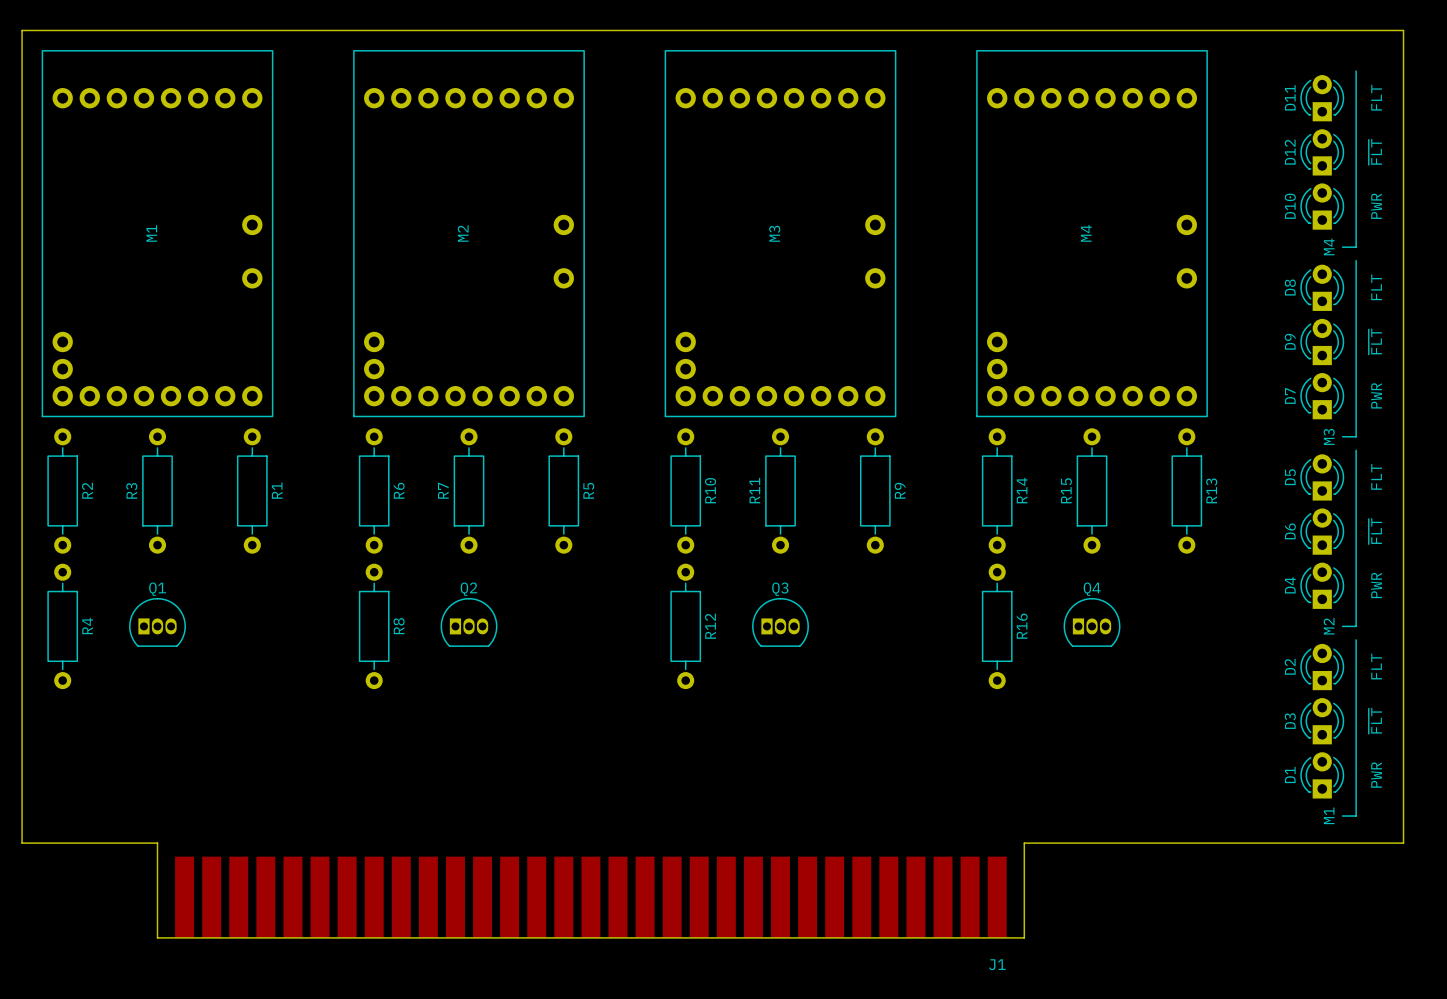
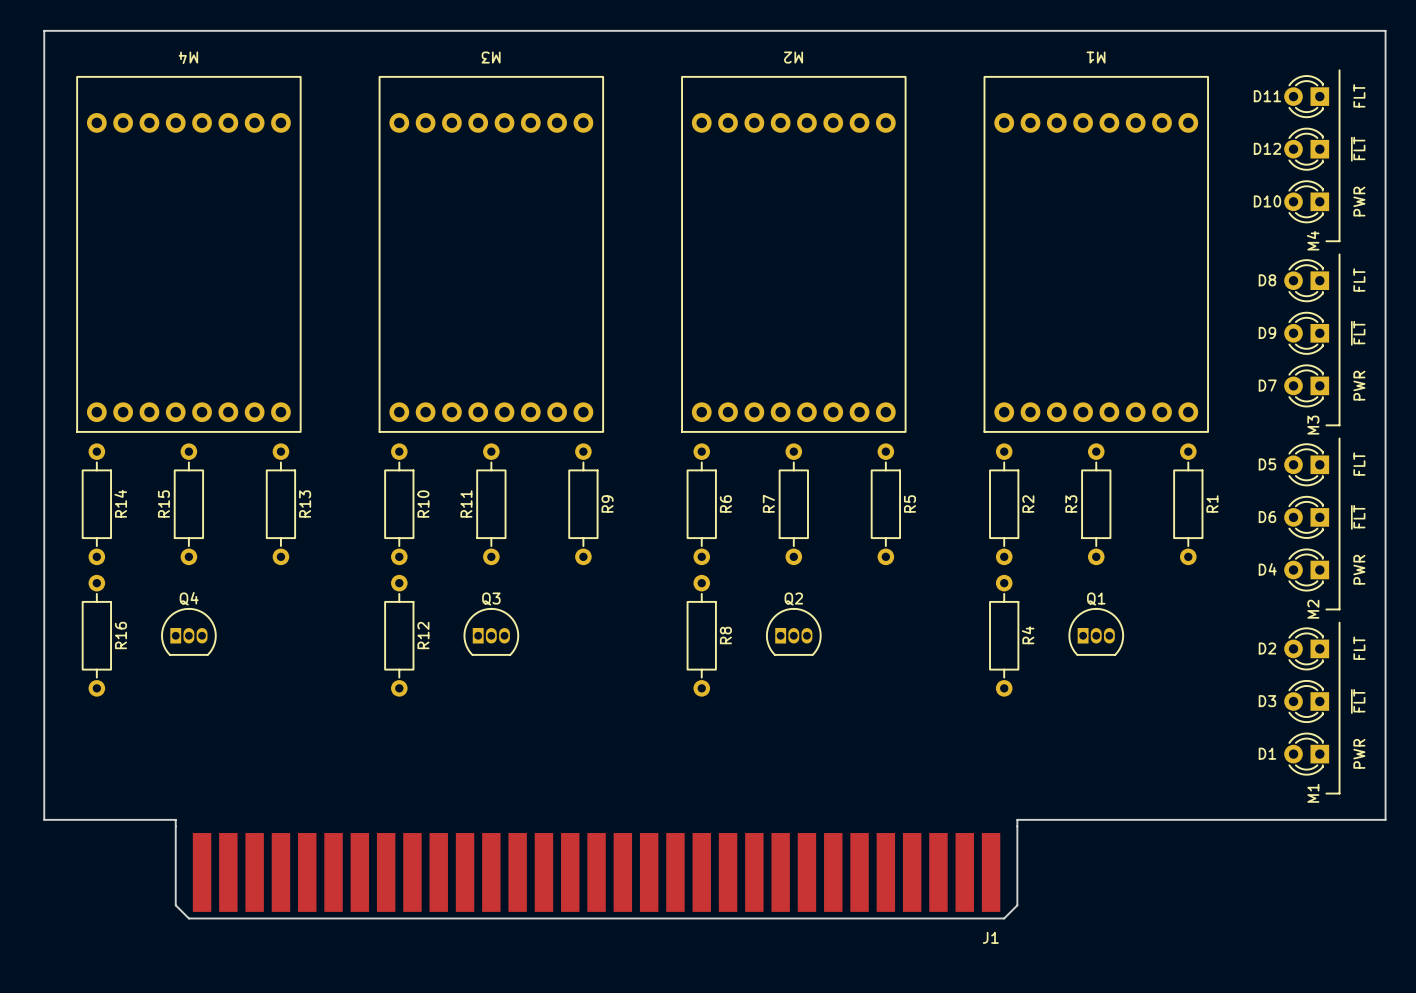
M1 footprint: [41, 50, 274, 418] -> [983, 76, 1209, 433]
M2 footprint: [353, 50, 585, 418] -> [681, 76, 907, 433]
M3 footprint: [664, 50, 897, 418] -> [379, 76, 604, 433]
M4 footprint: [976, 50, 1208, 418] -> [76, 76, 302, 433]
D11 rotation: 0° (1322, 98) -> 90° counterclockwise (1306, 96)
D12 rotation: 0° (1322, 152) -> 90° counterclockwise (1306, 149)
D10 rotation: 0° (1322, 206) -> 90° counterclockwise (1306, 201)
M1 name position: M1 (151, 233) -> M1 (1096, 57)
M2 name position: M2 (463, 233) -> M2 (793, 57)
M3 name position: M3 (774, 233) -> M3 (491, 57)
M4 name position: M4 (1086, 233) -> M4 (188, 57)
D8 rotation: 0° (1322, 287) -> 90° counterclockwise (1306, 280)
D9 rotation: 0° (1322, 341) -> 90° counterclockwise (1306, 333)
D7 rotation: 0° (1322, 396) -> 90° counterclockwise (1306, 385)
D5 rotation: 0° (1322, 477) -> 90° counterclockwise (1306, 464)
R2 position: (62, 490) -> (1004, 504)
R3 position: (157, 490) -> (1096, 504)
R1 position: (252, 490) -> (1188, 504)
R6 position: (374, 490) -> (701, 504)
R7 position: (469, 490) -> (793, 504)
R5 position: (563, 490) -> (885, 504)
R10 position: (685, 490) -> (399, 504)
R11 position: (780, 490) -> (491, 504)
R9 position: (875, 490) -> (583, 504)
R14 position: (997, 490) -> (96, 504)
R15 position: (1092, 490) -> (188, 504)
R13 position: (1186, 490) -> (280, 504)
D6 rotation: 0° (1322, 531) -> 90° counterclockwise (1306, 517)
D4 rotation: 0° (1322, 585) -> 90° counterclockwise (1306, 570)
Q1 position: (157, 622) -> (1096, 631)
Q2 position: (469, 622) -> (793, 631)
Q3 position: (780, 622) -> (491, 631)
Q4 position: (1092, 622) -> (188, 631)
R4 position: (62, 626) -> (1004, 635)
R8 position: (374, 626) -> (701, 635)
R12 position: (685, 626) -> (399, 635)
R16 position: (997, 626) -> (96, 635)
D2 rotation: 0° (1322, 667) -> 90° counterclockwise (1306, 648)
D3 rotation: 0° (1322, 721) -> 90° counterclockwise (1306, 701)
D1 rotation: 0° (1322, 775) -> 90° counterclockwise (1306, 754)
J1 footprint: [156, 842, 1025, 939] -> [175, 826, 1018, 919]

